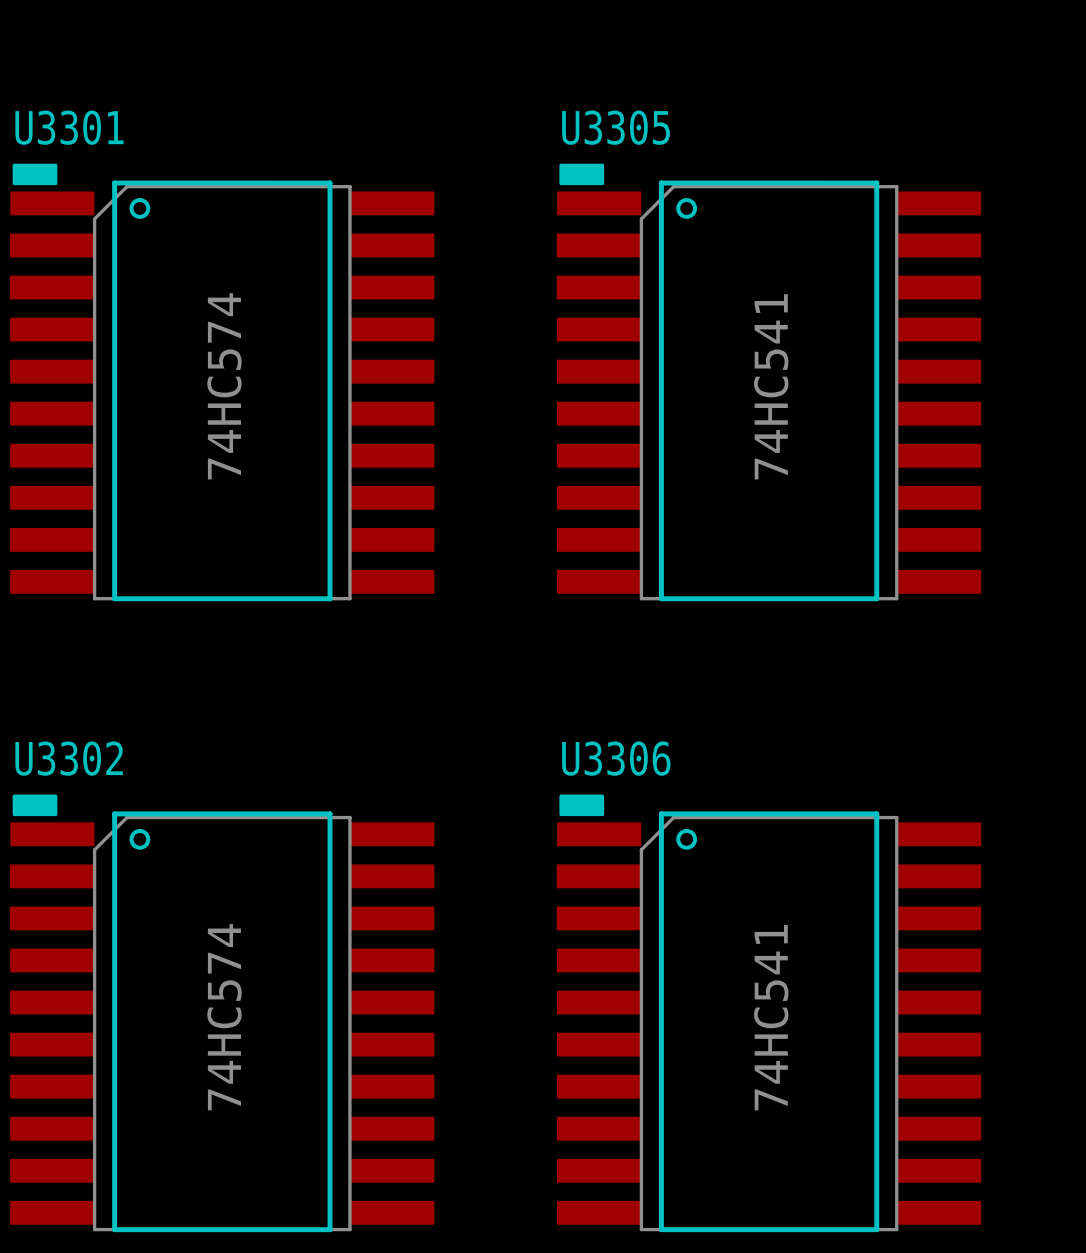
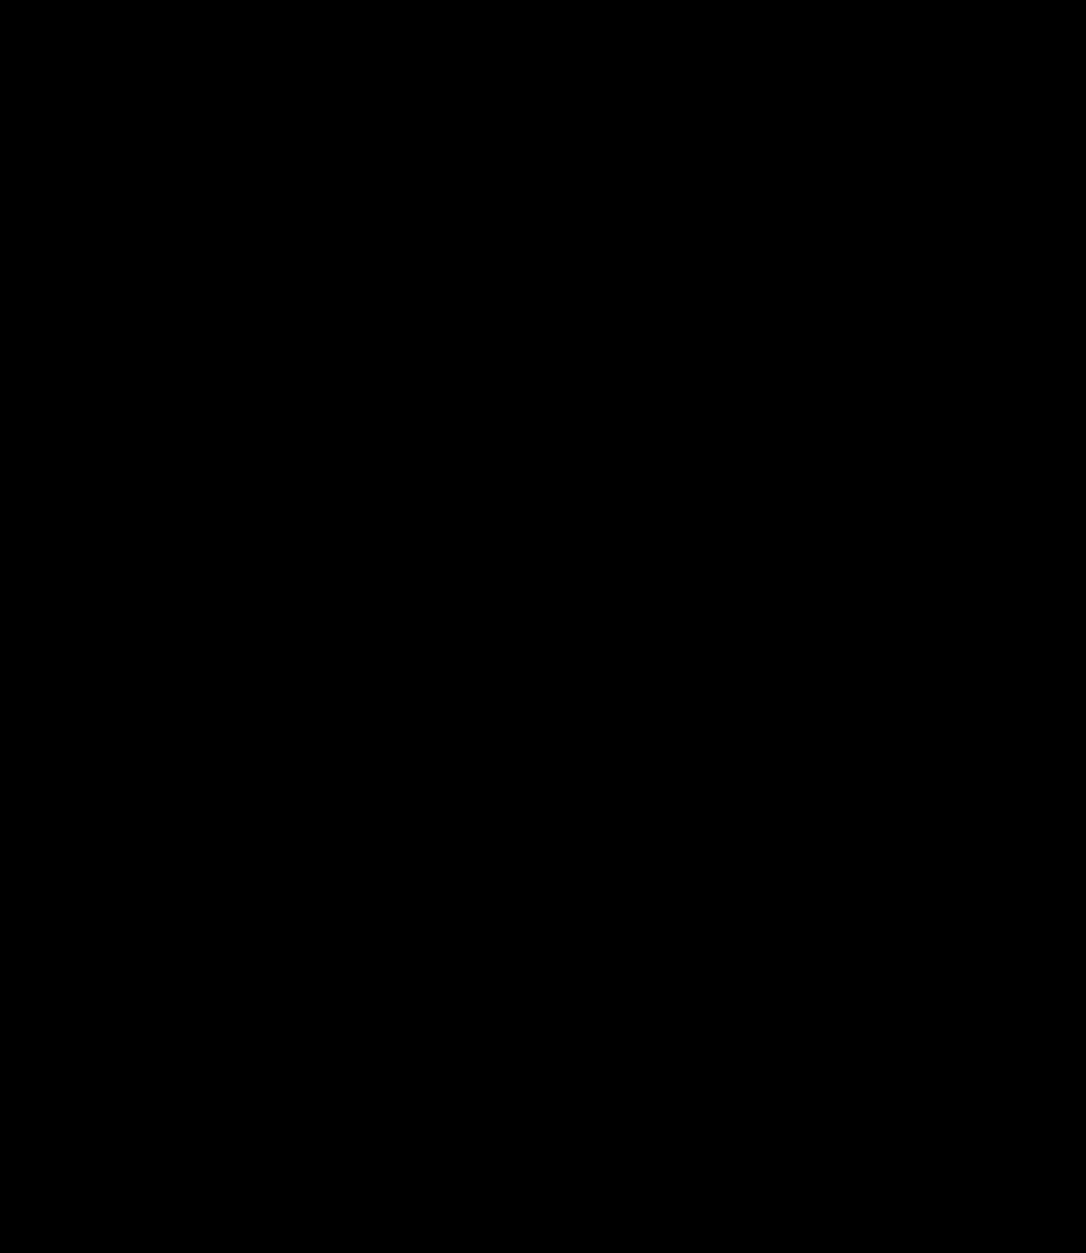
U3301: 74HC574 (222, 382) -> none
U3305: 74HC541 (768, 382) -> none
U3302: 74HC574 (222, 1013) -> none
U3306: 74HC541 (768, 1013) -> none

